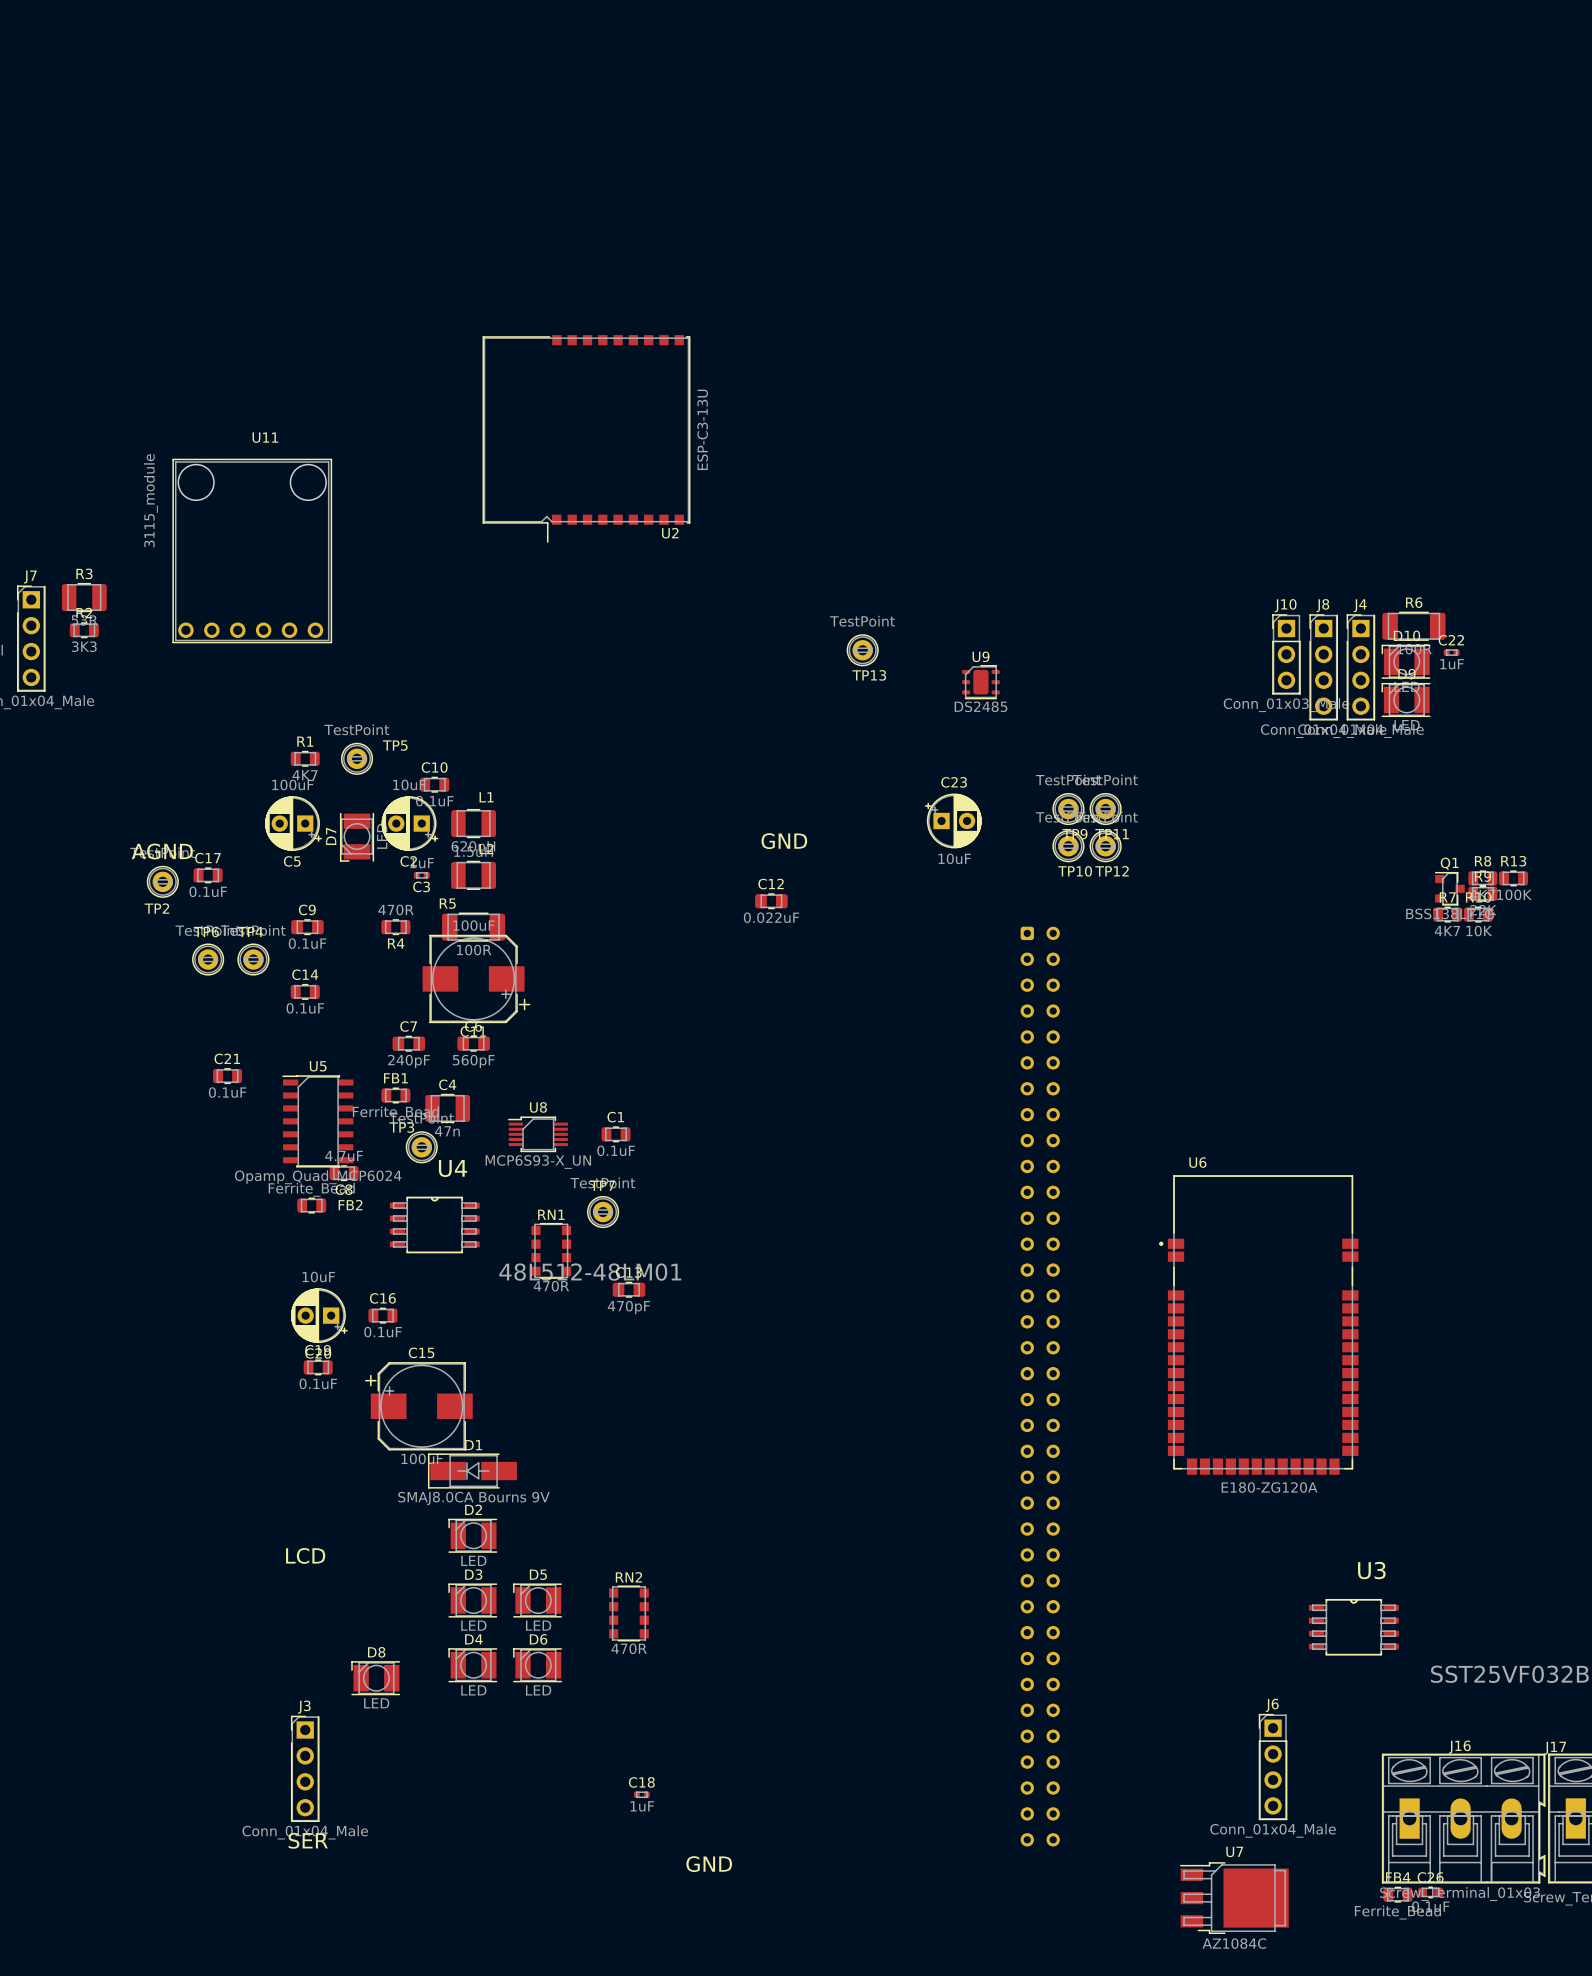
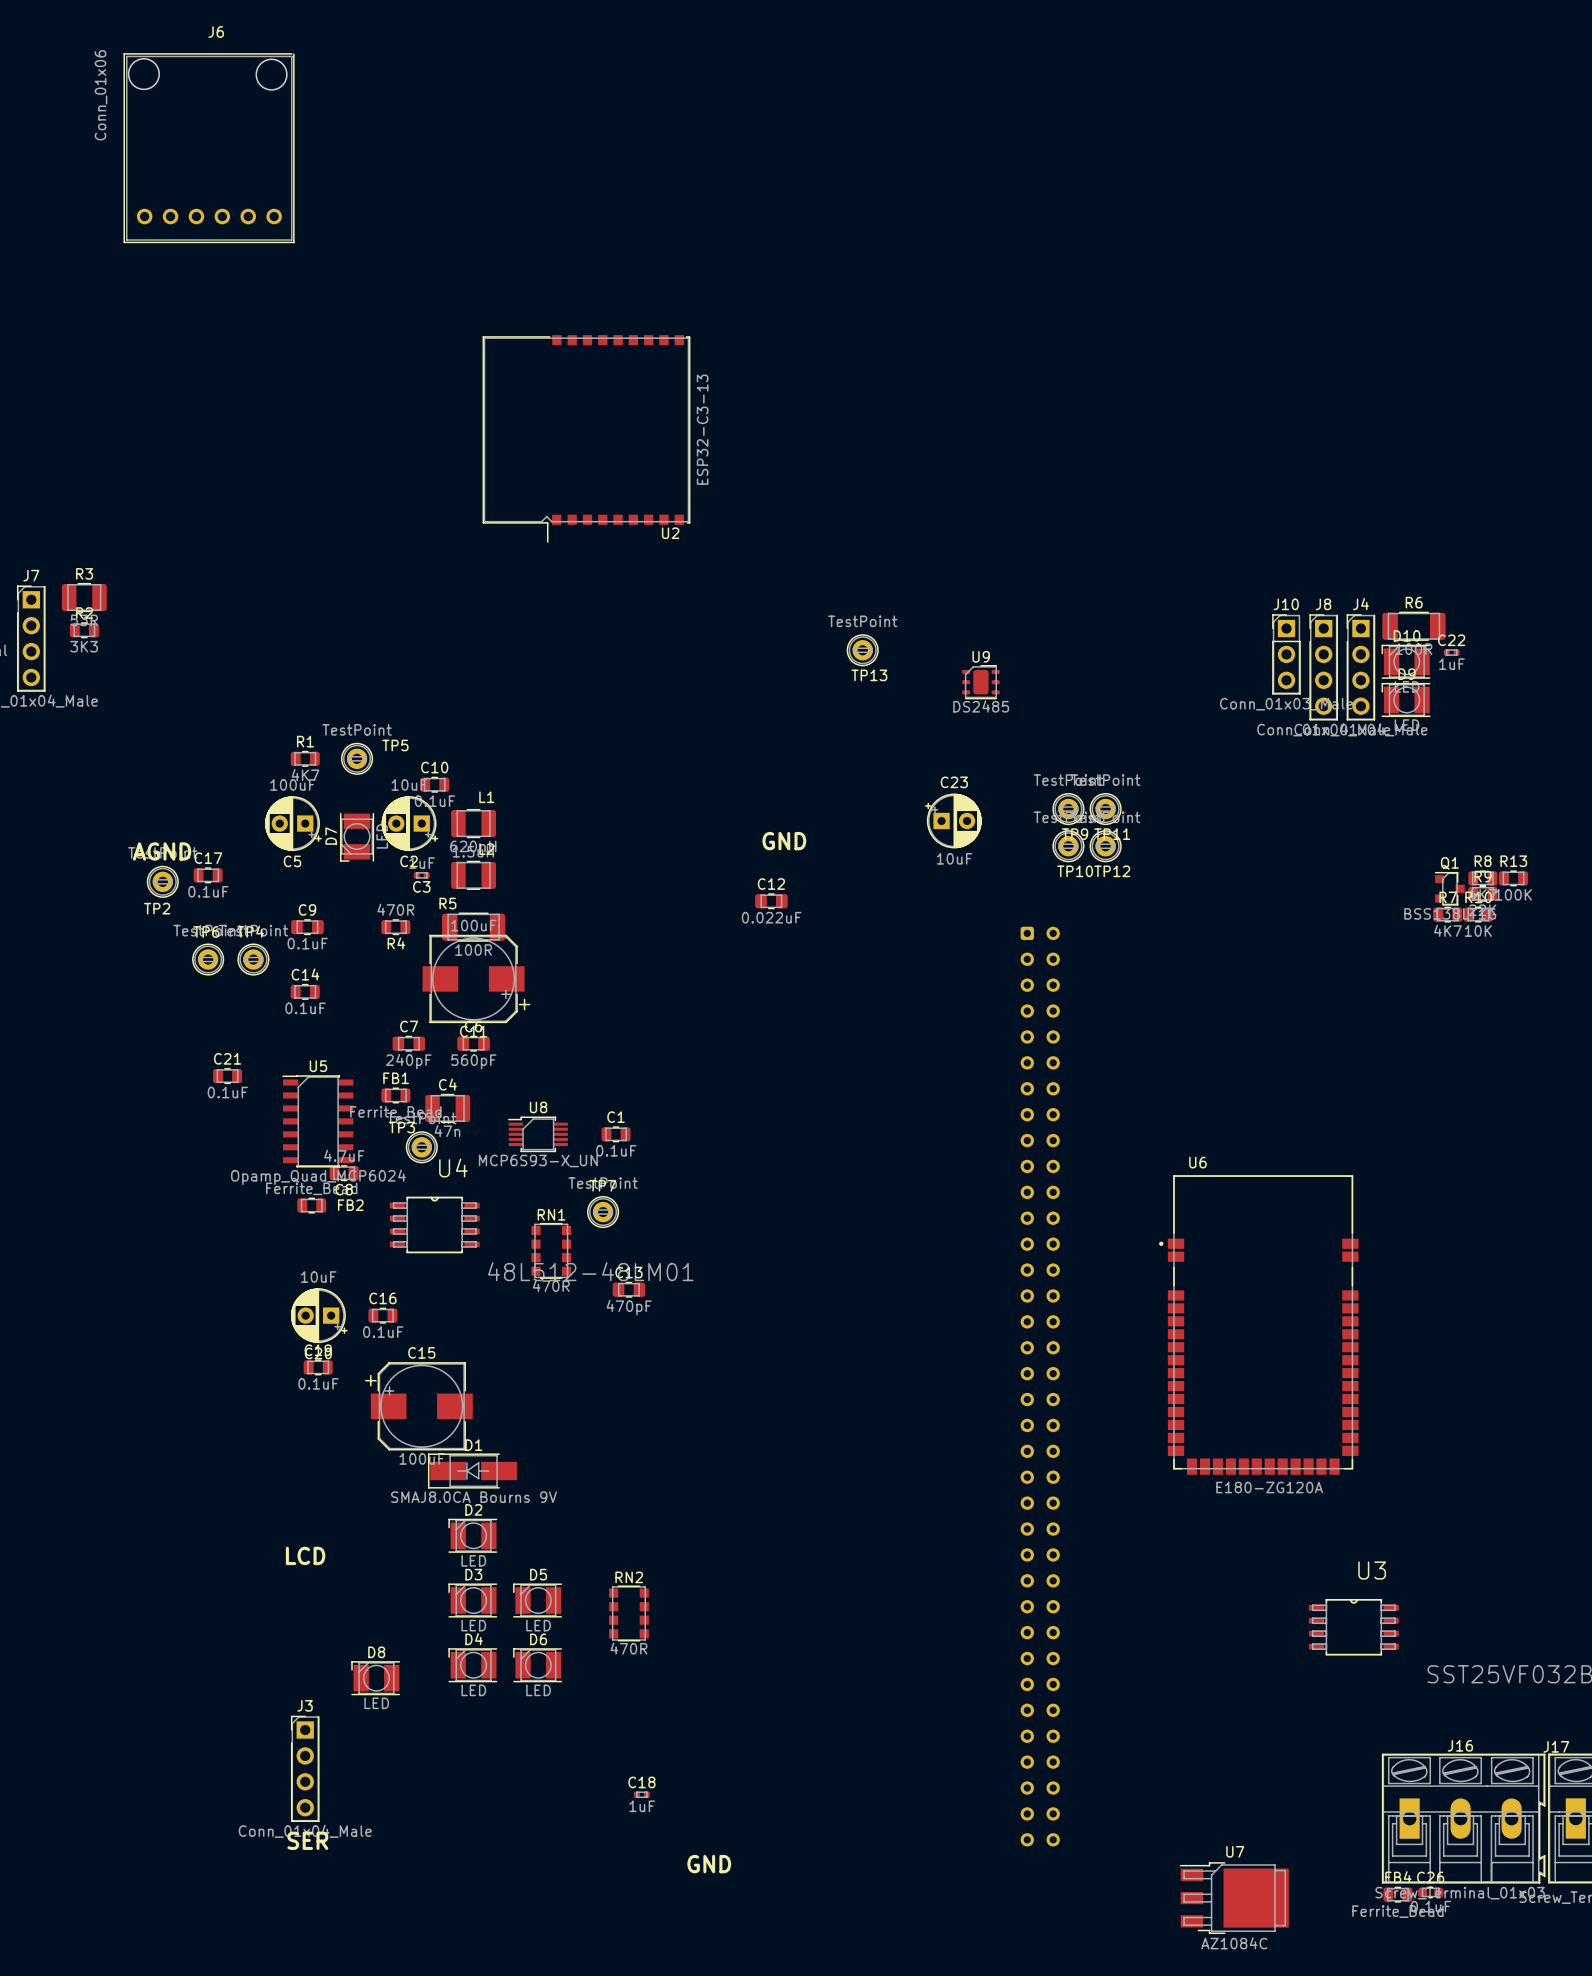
U2 value: ESP-C3-13U (702, 429) -> ESP32-C3-13 (702, 429)
U11: 3115_module (252, 550) -> none
J6 name position: J6 (1272, 1705) -> J6 (216, 32)
J6 footprint: [1258, 1714, 1288, 1821] -> [123, 53, 295, 244]
J6 value: Conn_01x04_Male (1273, 1830) -> Conn_01x06 (101, 95)

